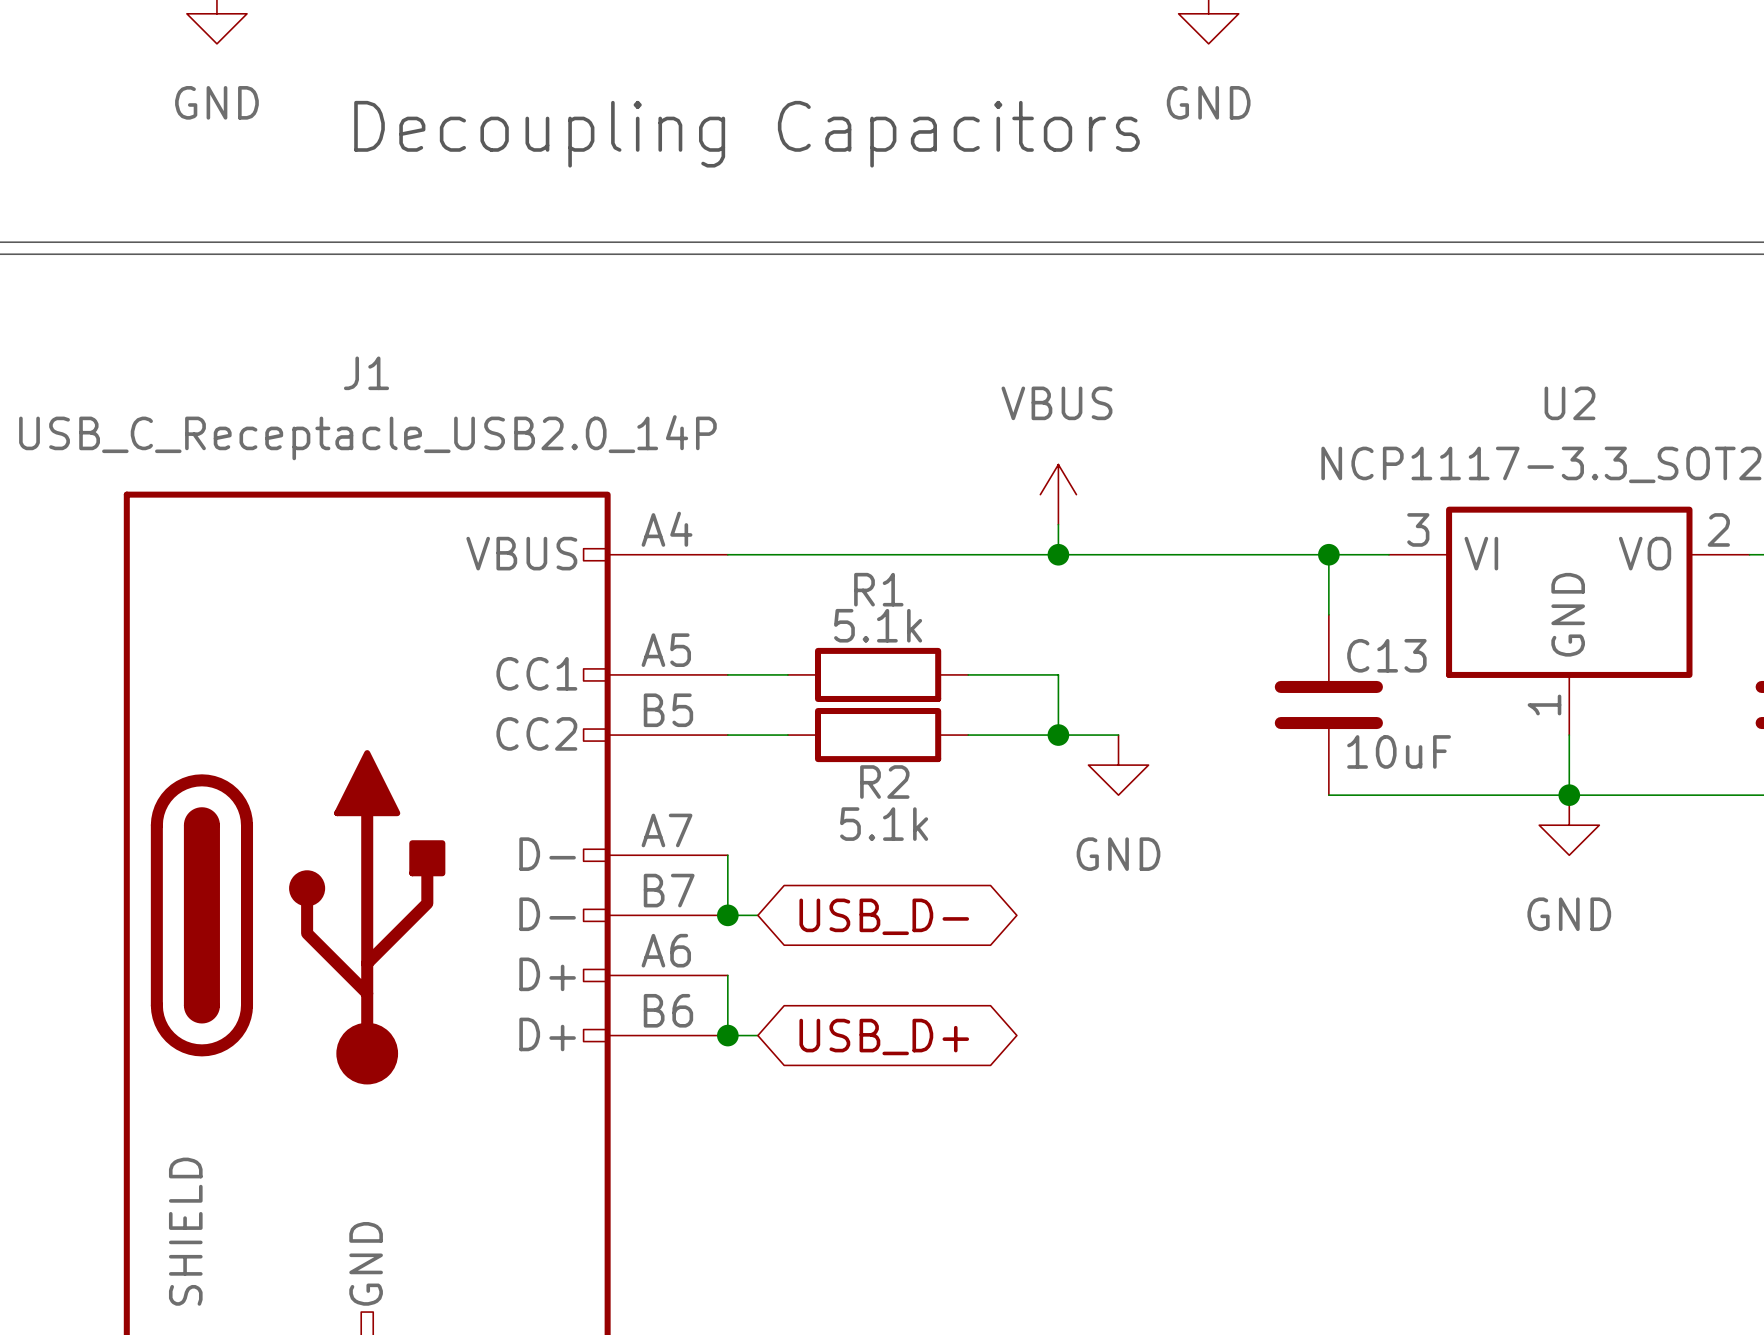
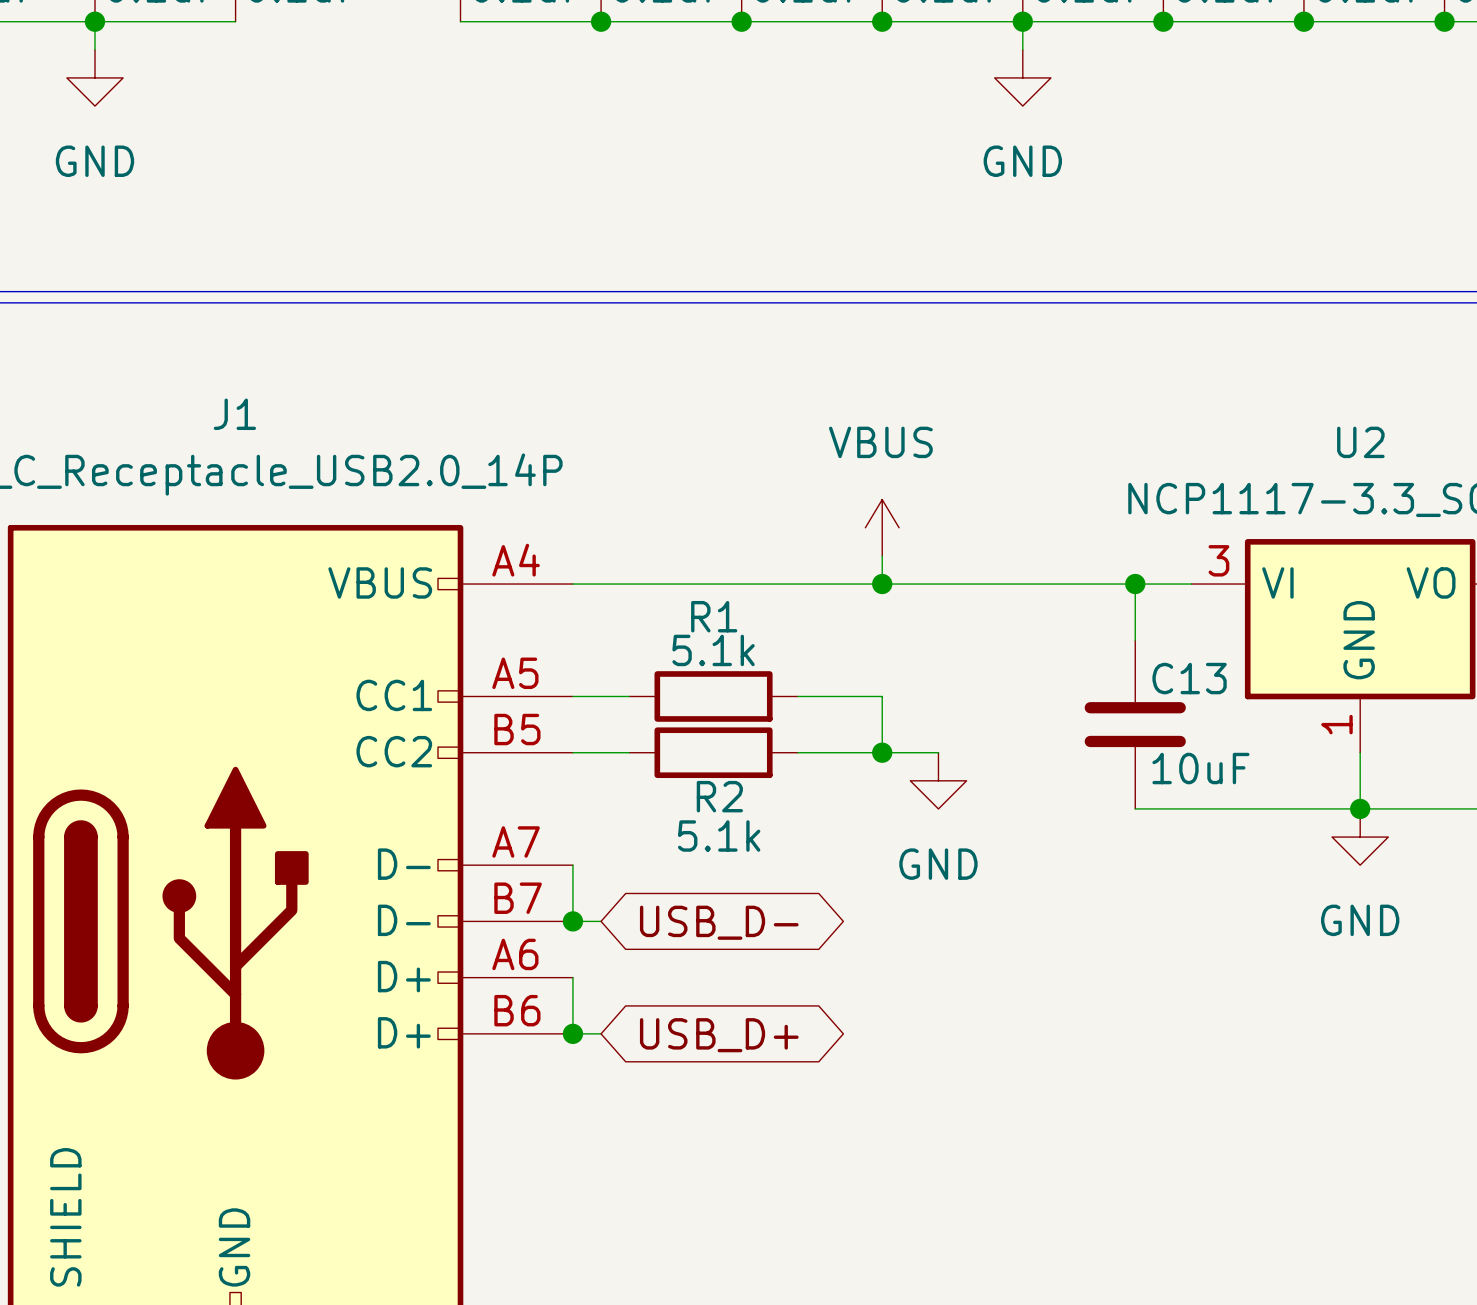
text: Decoupling Capacitors (746, 134) -> none

